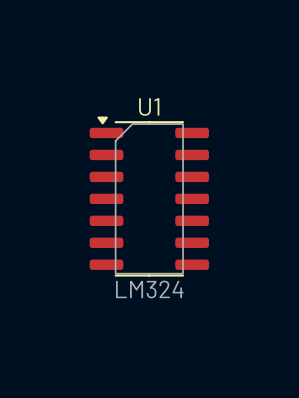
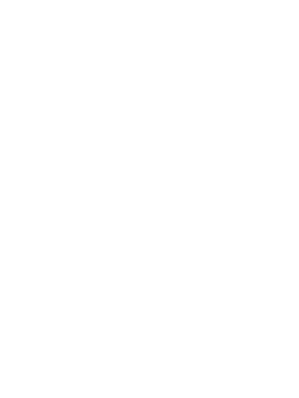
U1: LM324 (149, 196) -> none

